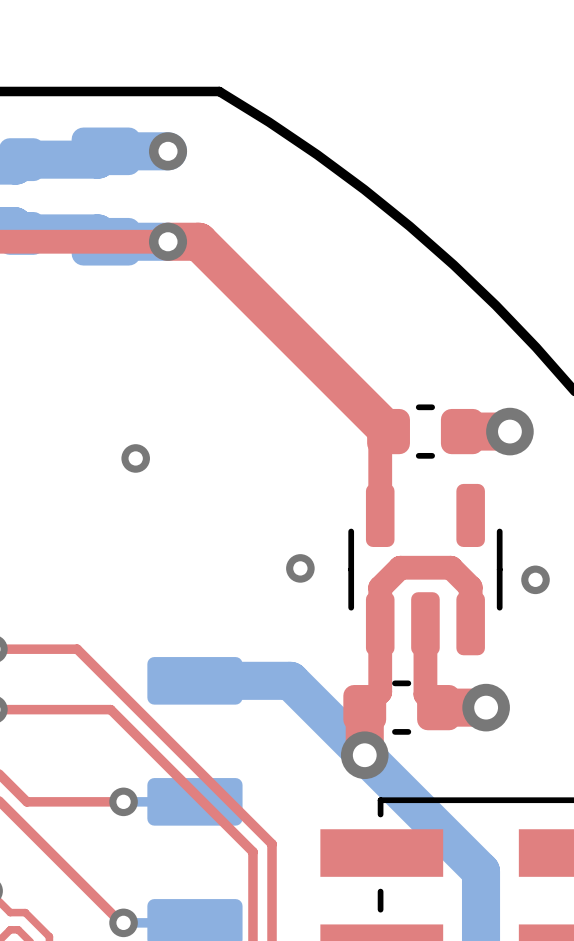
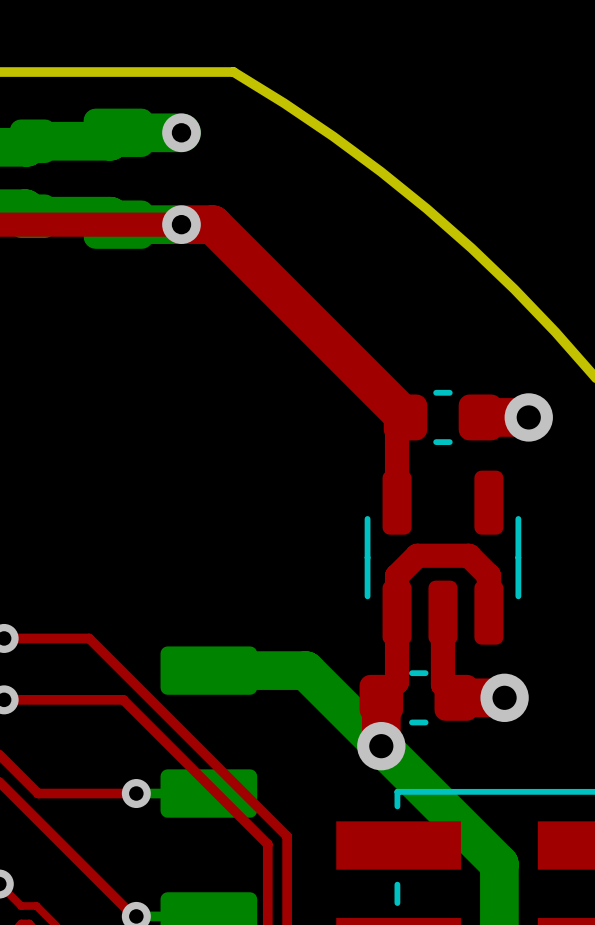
via: (135, 458) -> none
via: (300, 568) -> none
via: (535, 579) -> none

